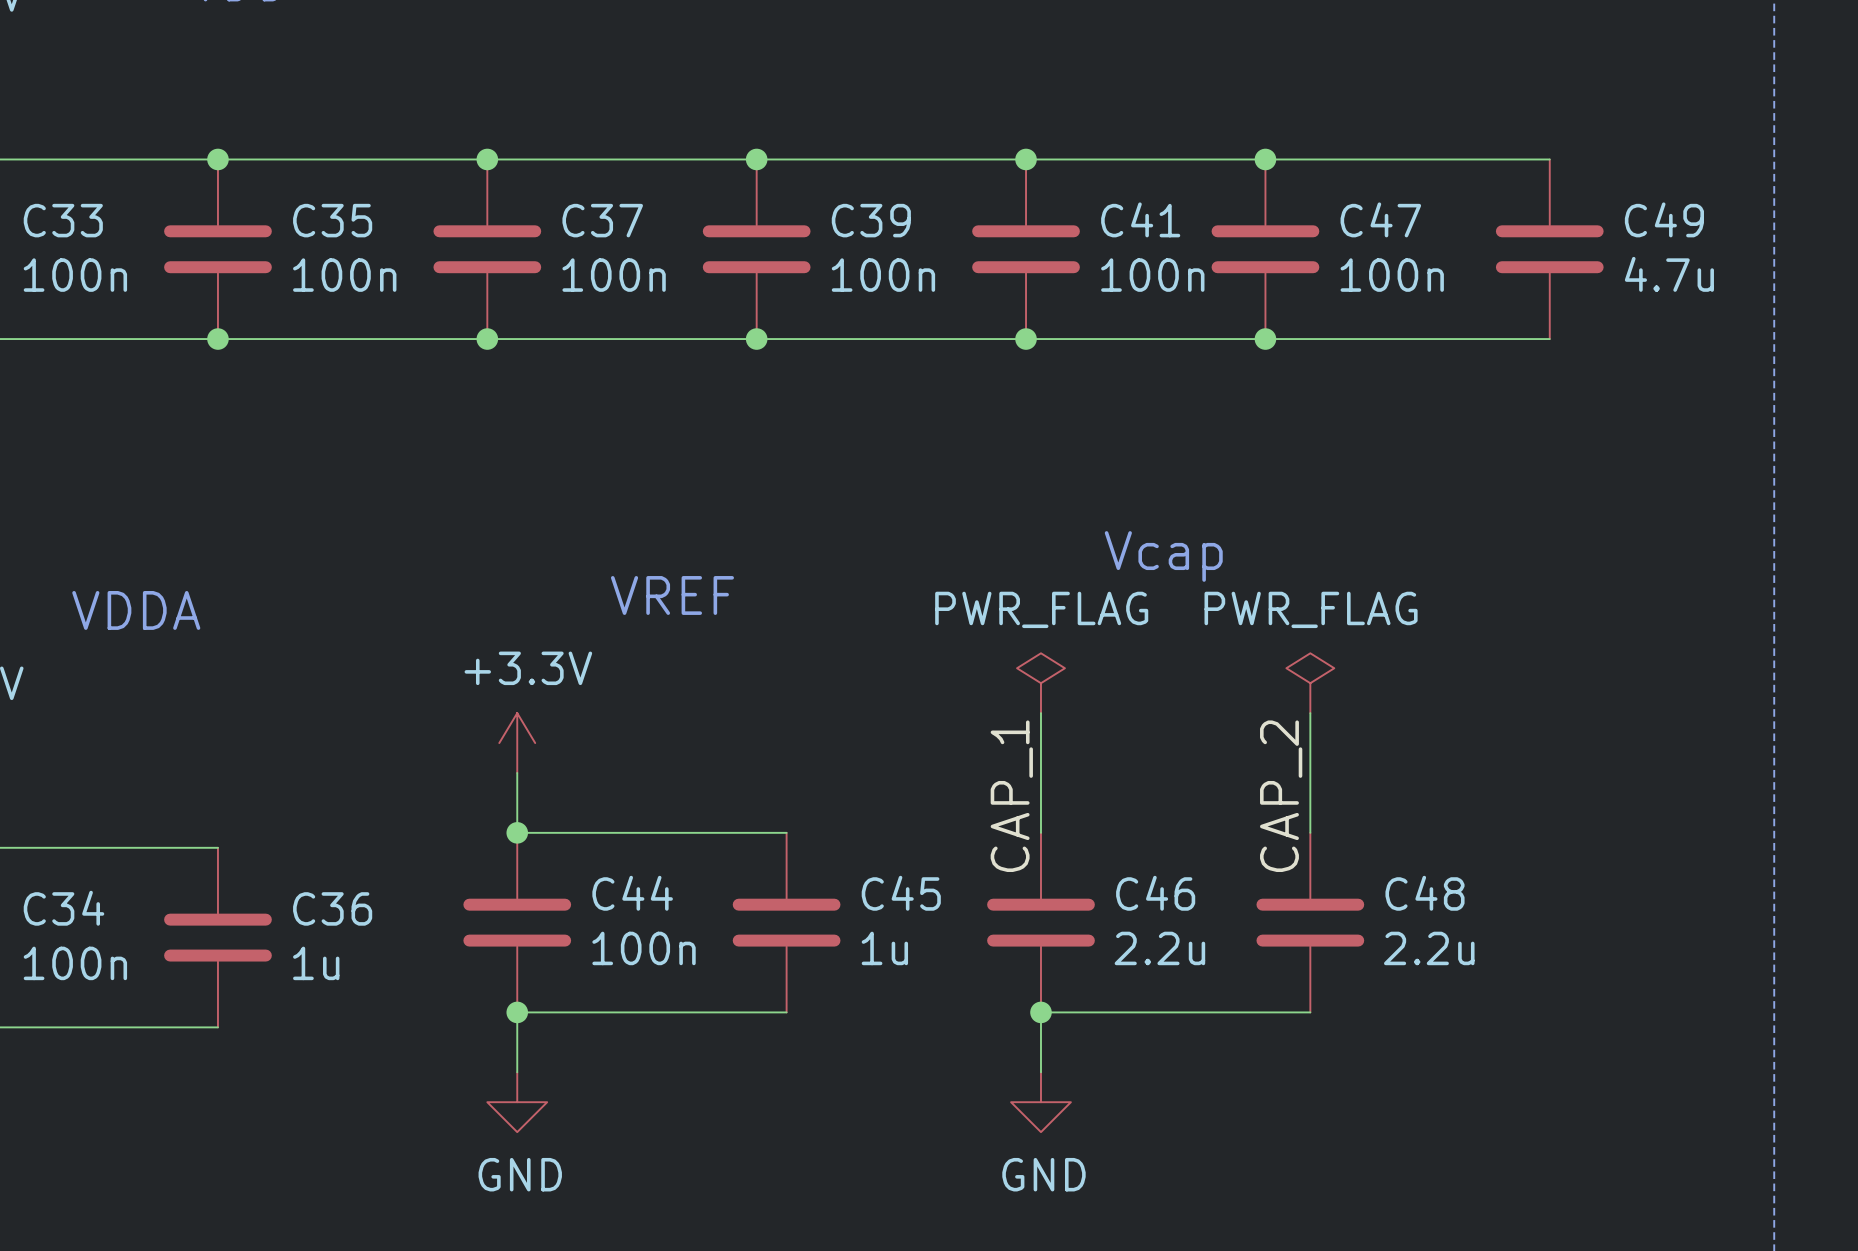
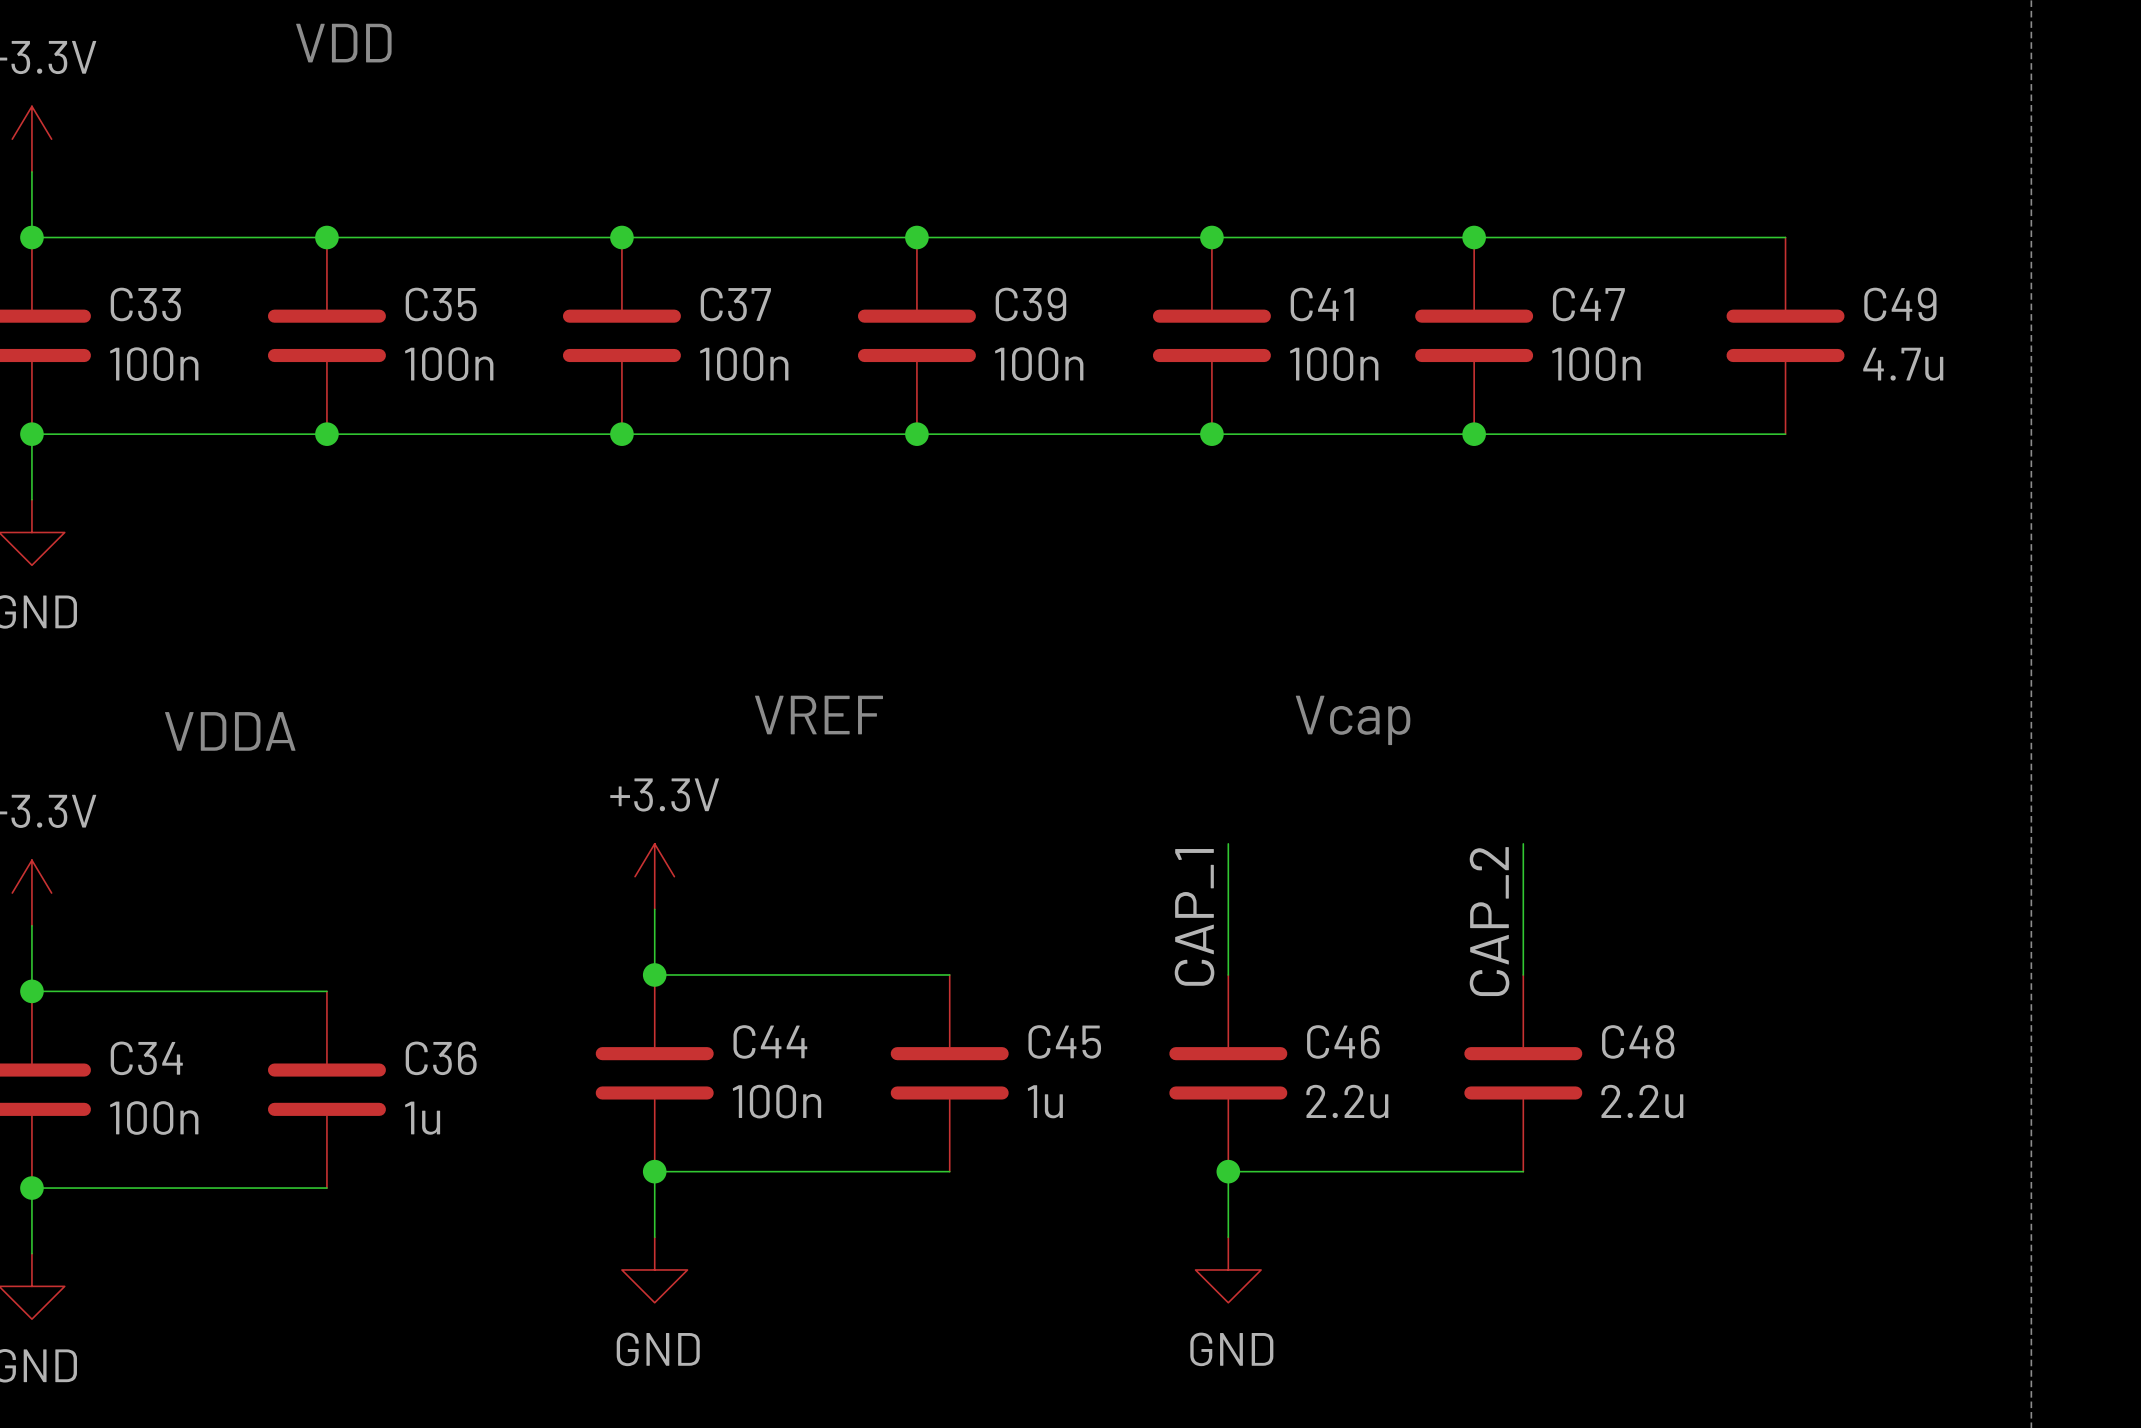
text position: Vcap (1163, 556) -> Vcap (1353, 720)
power symbol: PWR_FLAG (1040, 683) -> none
power symbol: PWR_FLAG (1310, 683) -> none

